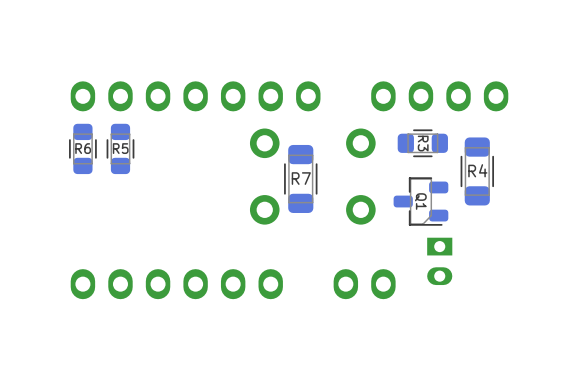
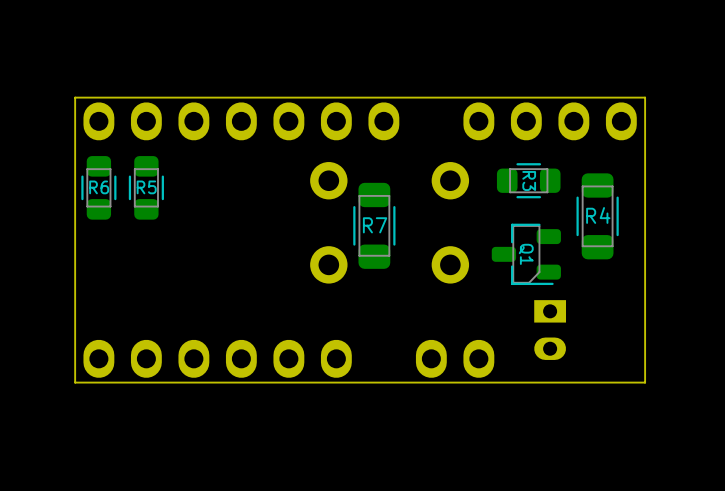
board edge: none -> (645, 97) (75, 97) (75, 382) (645, 382) (645, 97)

